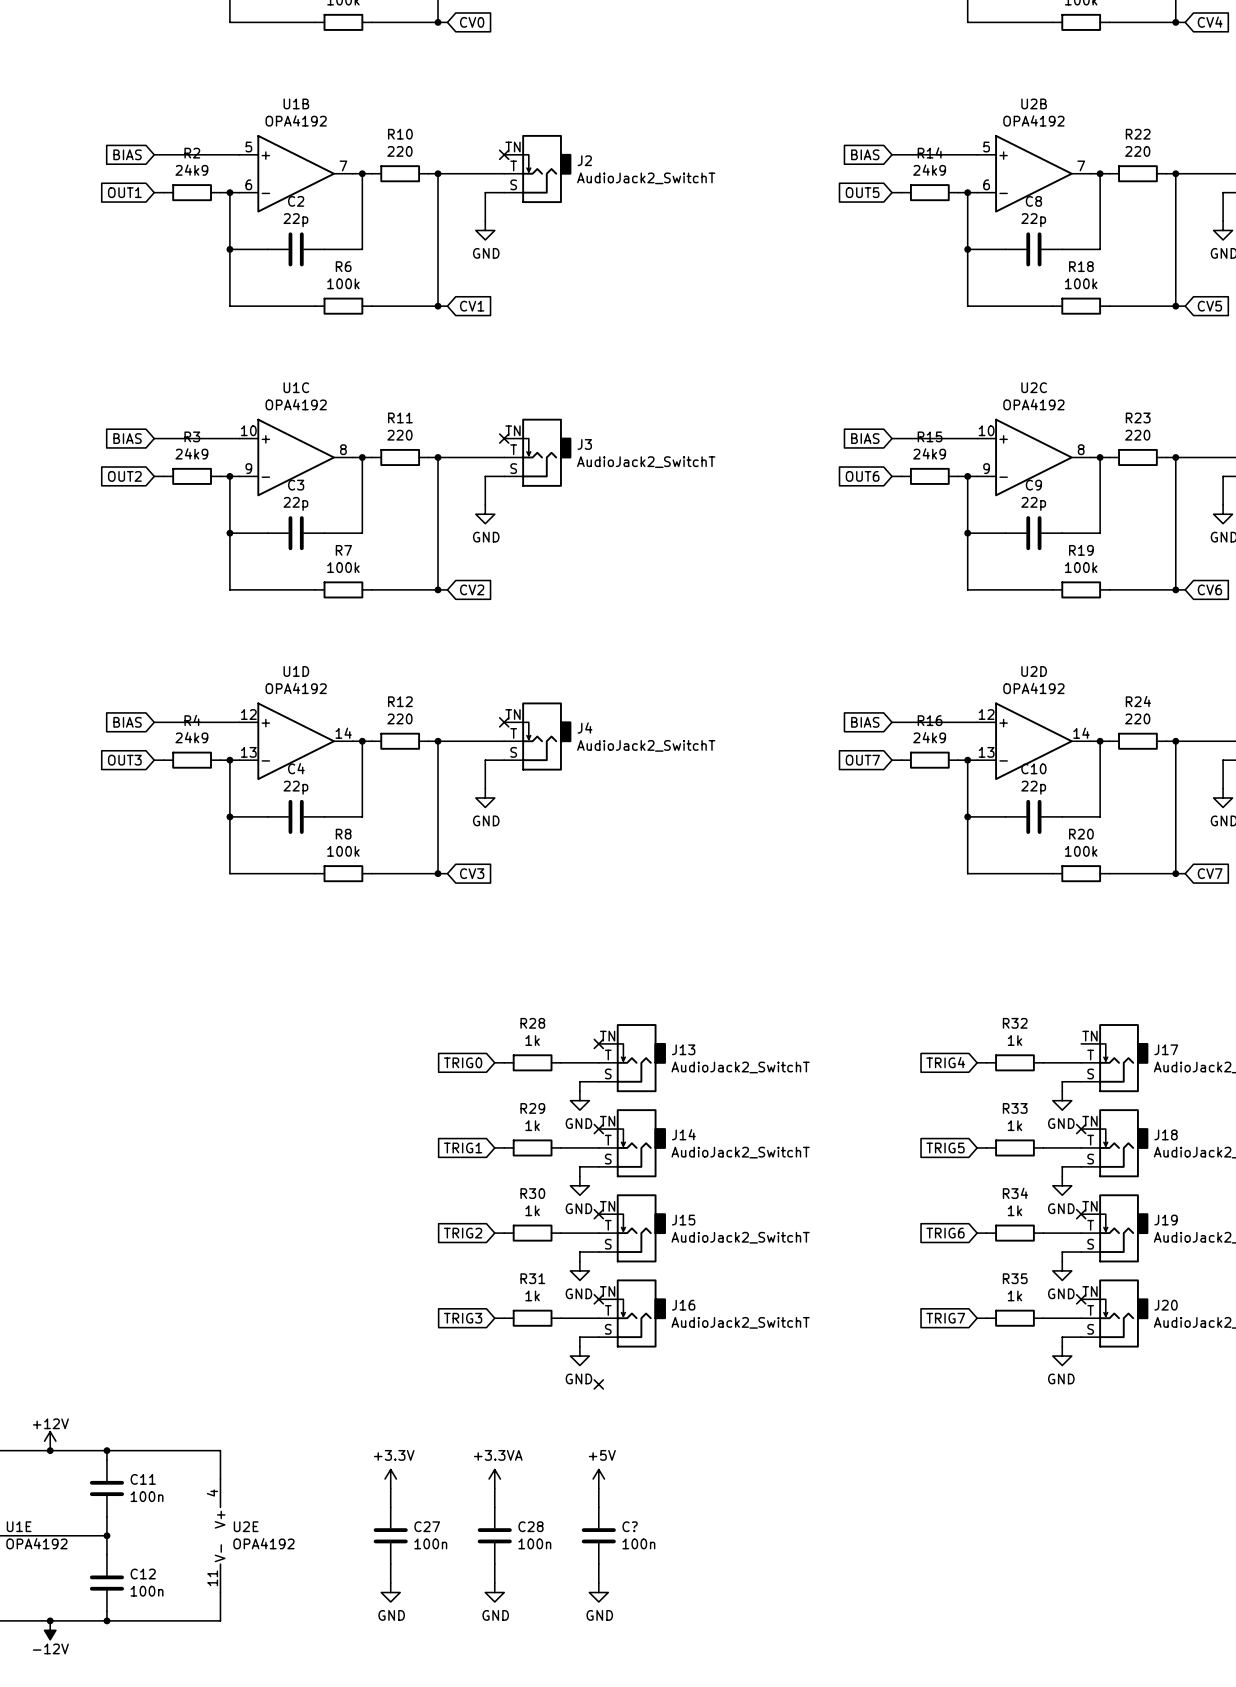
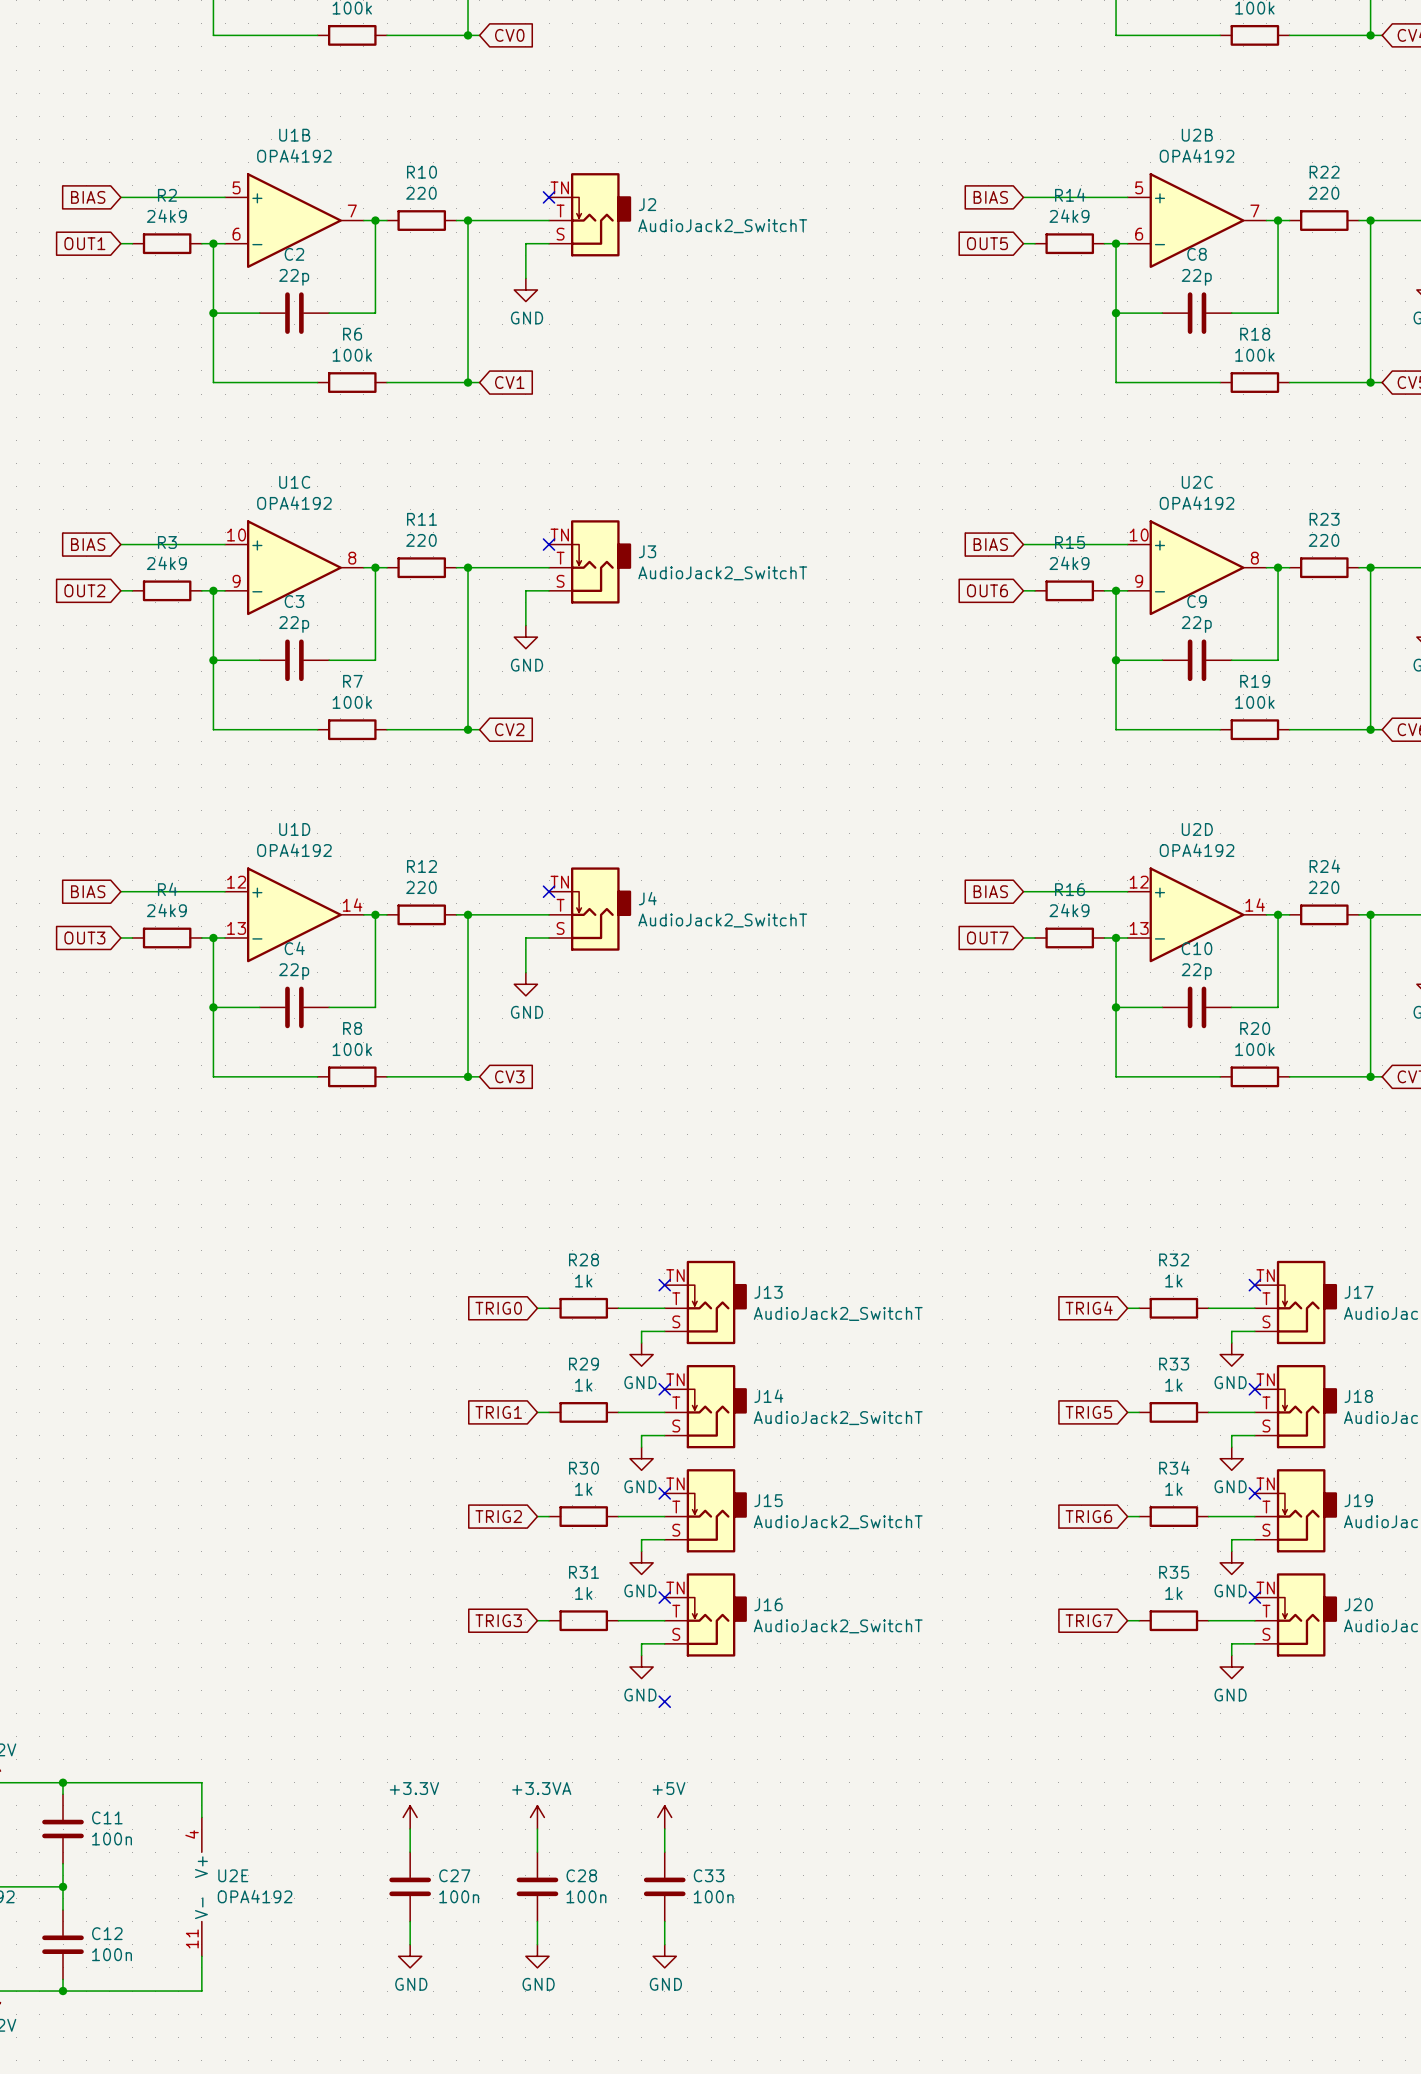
no-connect mark: none -> (1254, 1285)
C? name: C? (630, 1526) -> C33 (709, 1875)

